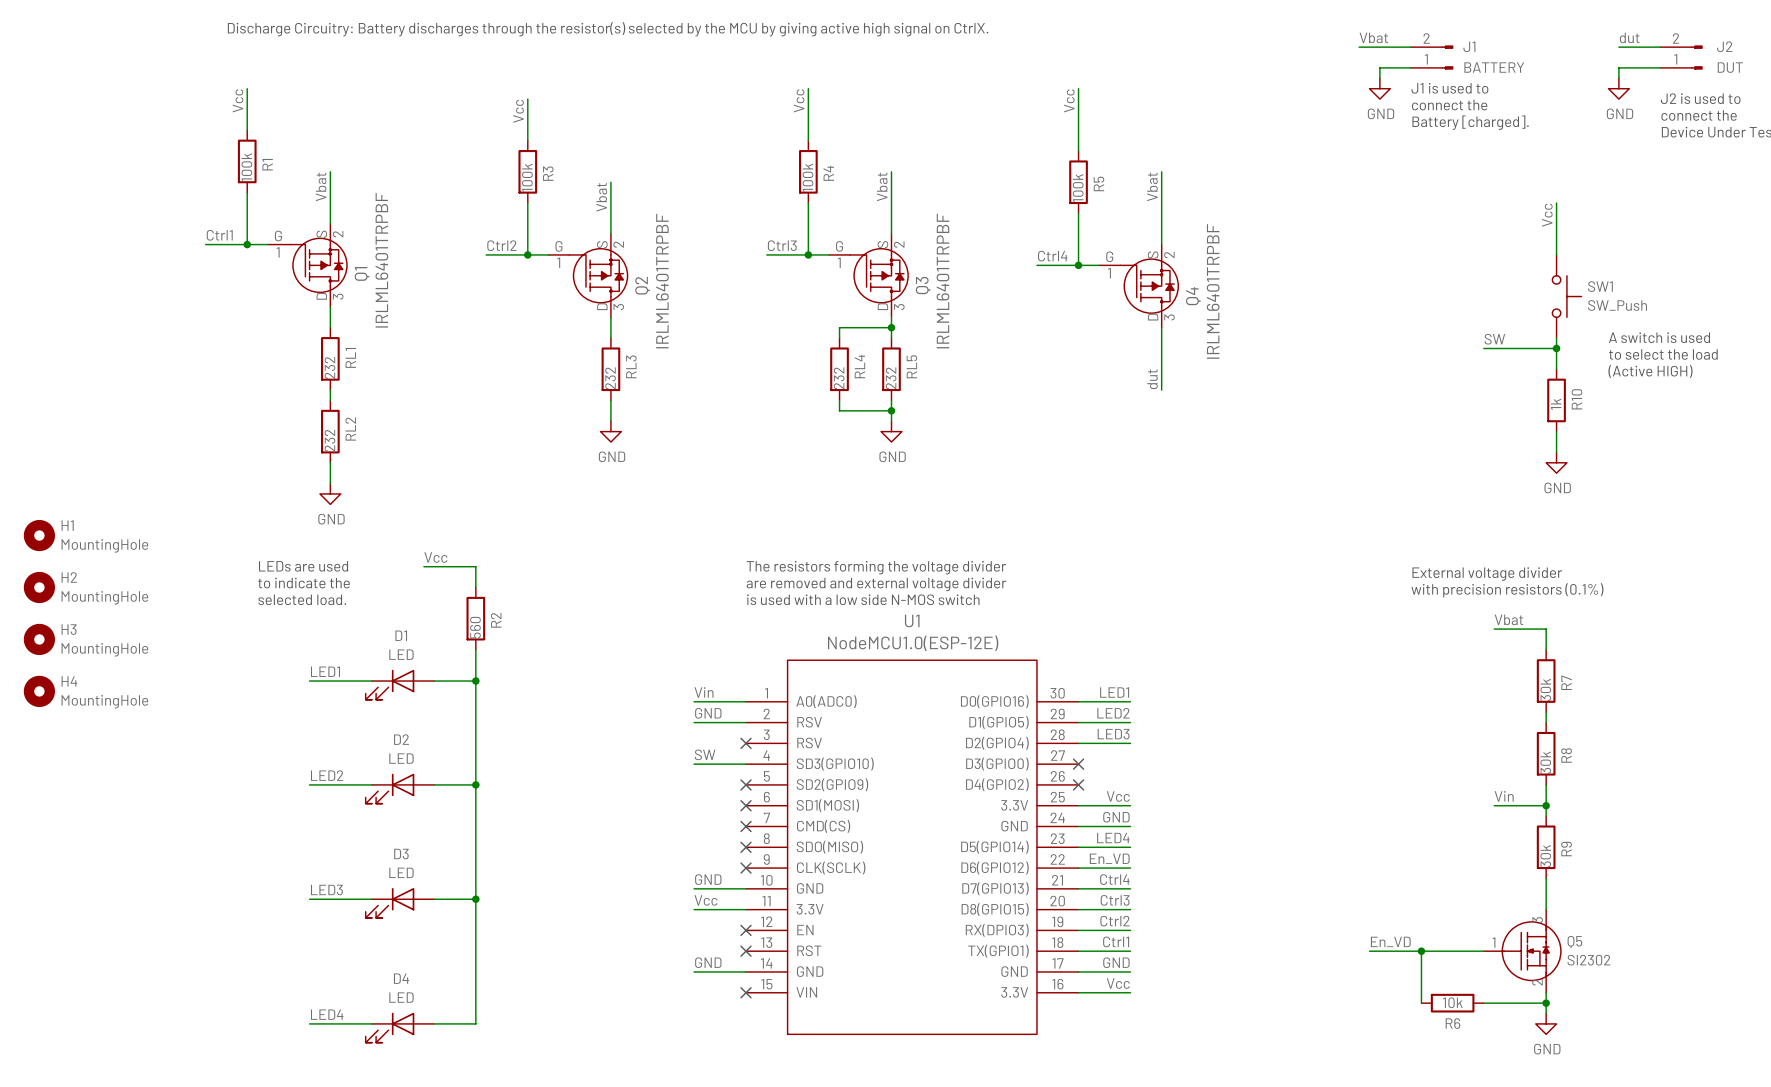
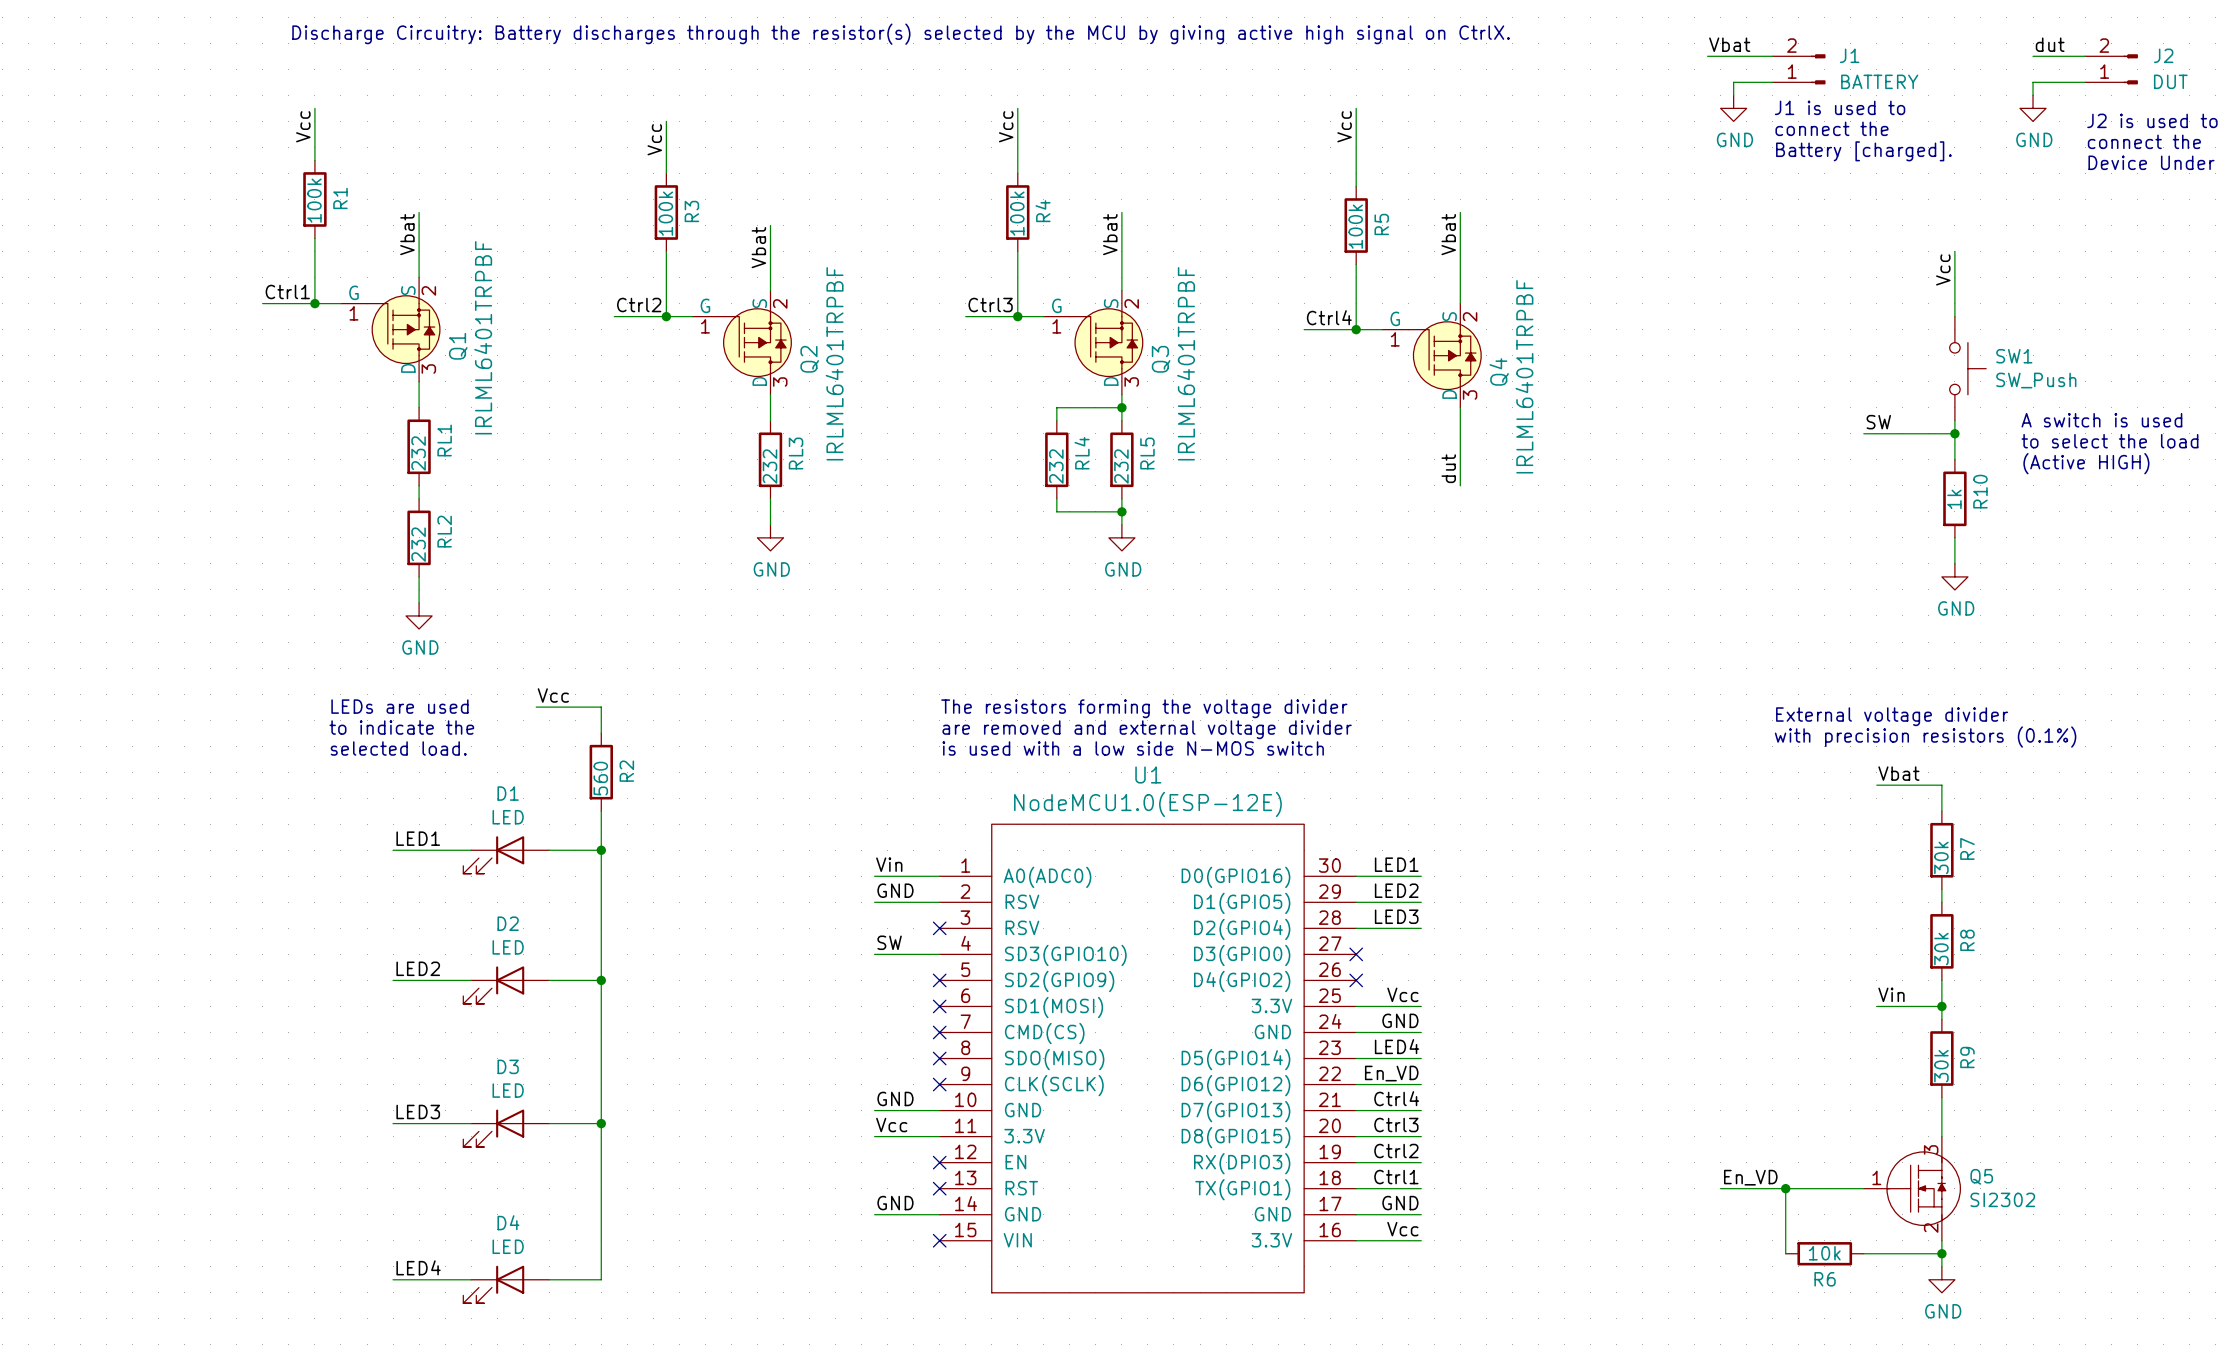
H1: MountingHole (39, 535) -> none
H2: MountingHole (39, 587) -> none
H3: MountingHole (39, 639) -> none
H4: MountingHole (39, 691) -> none

